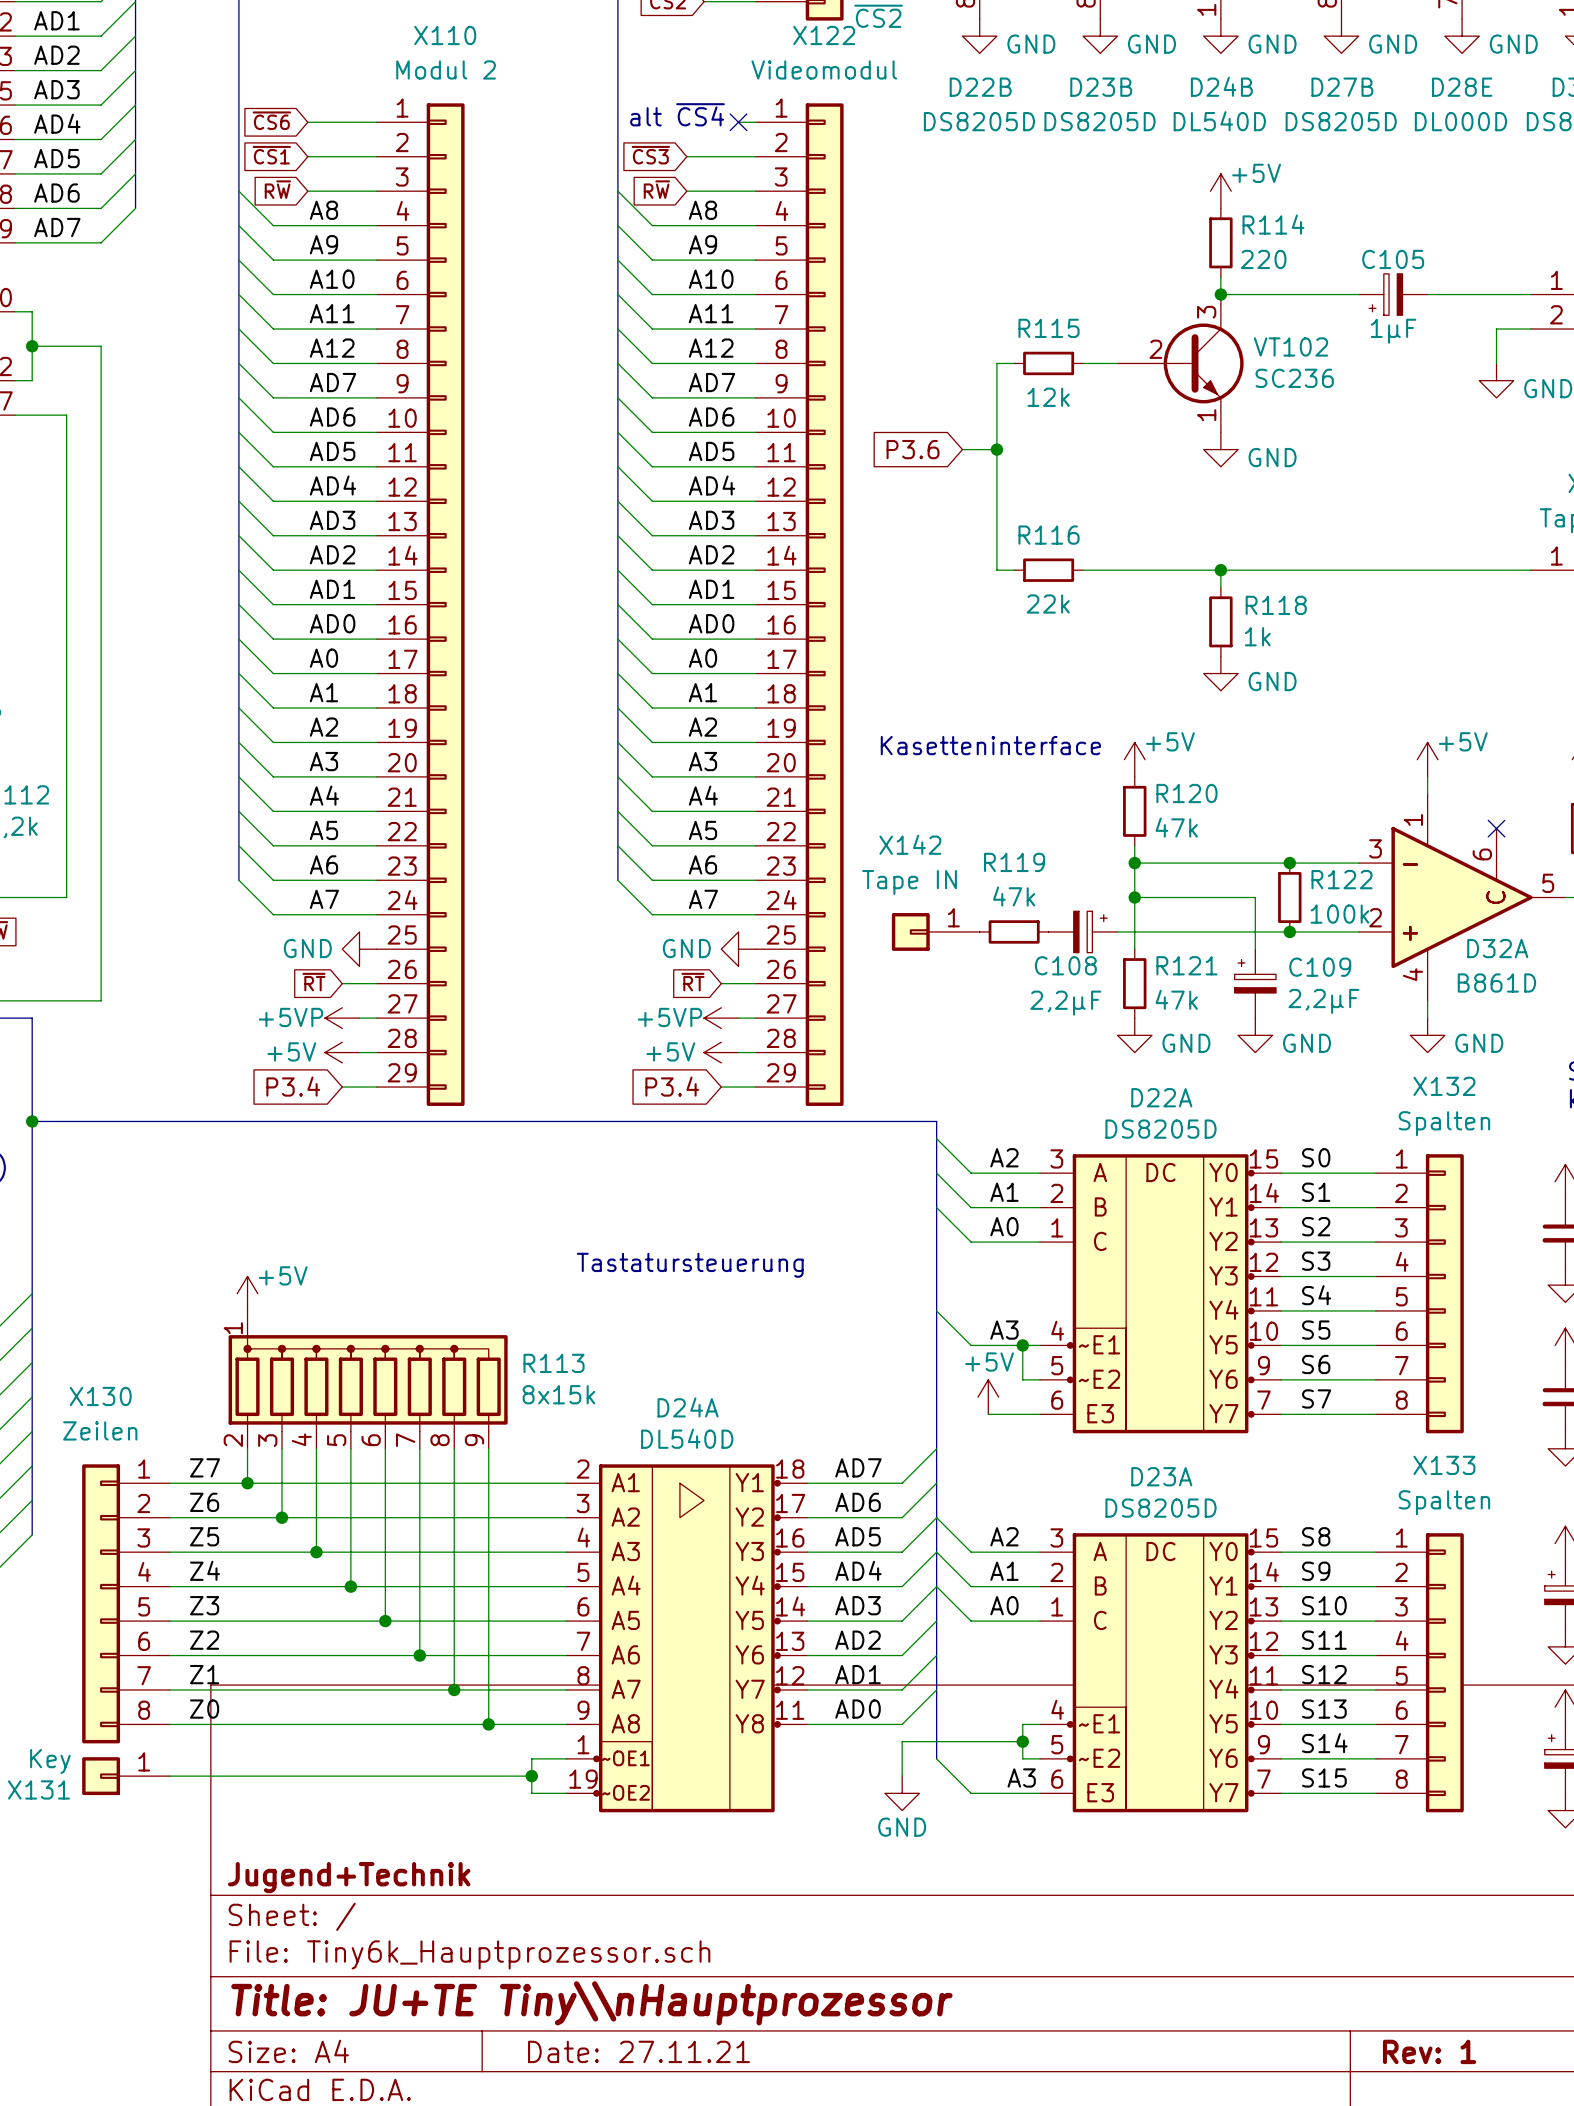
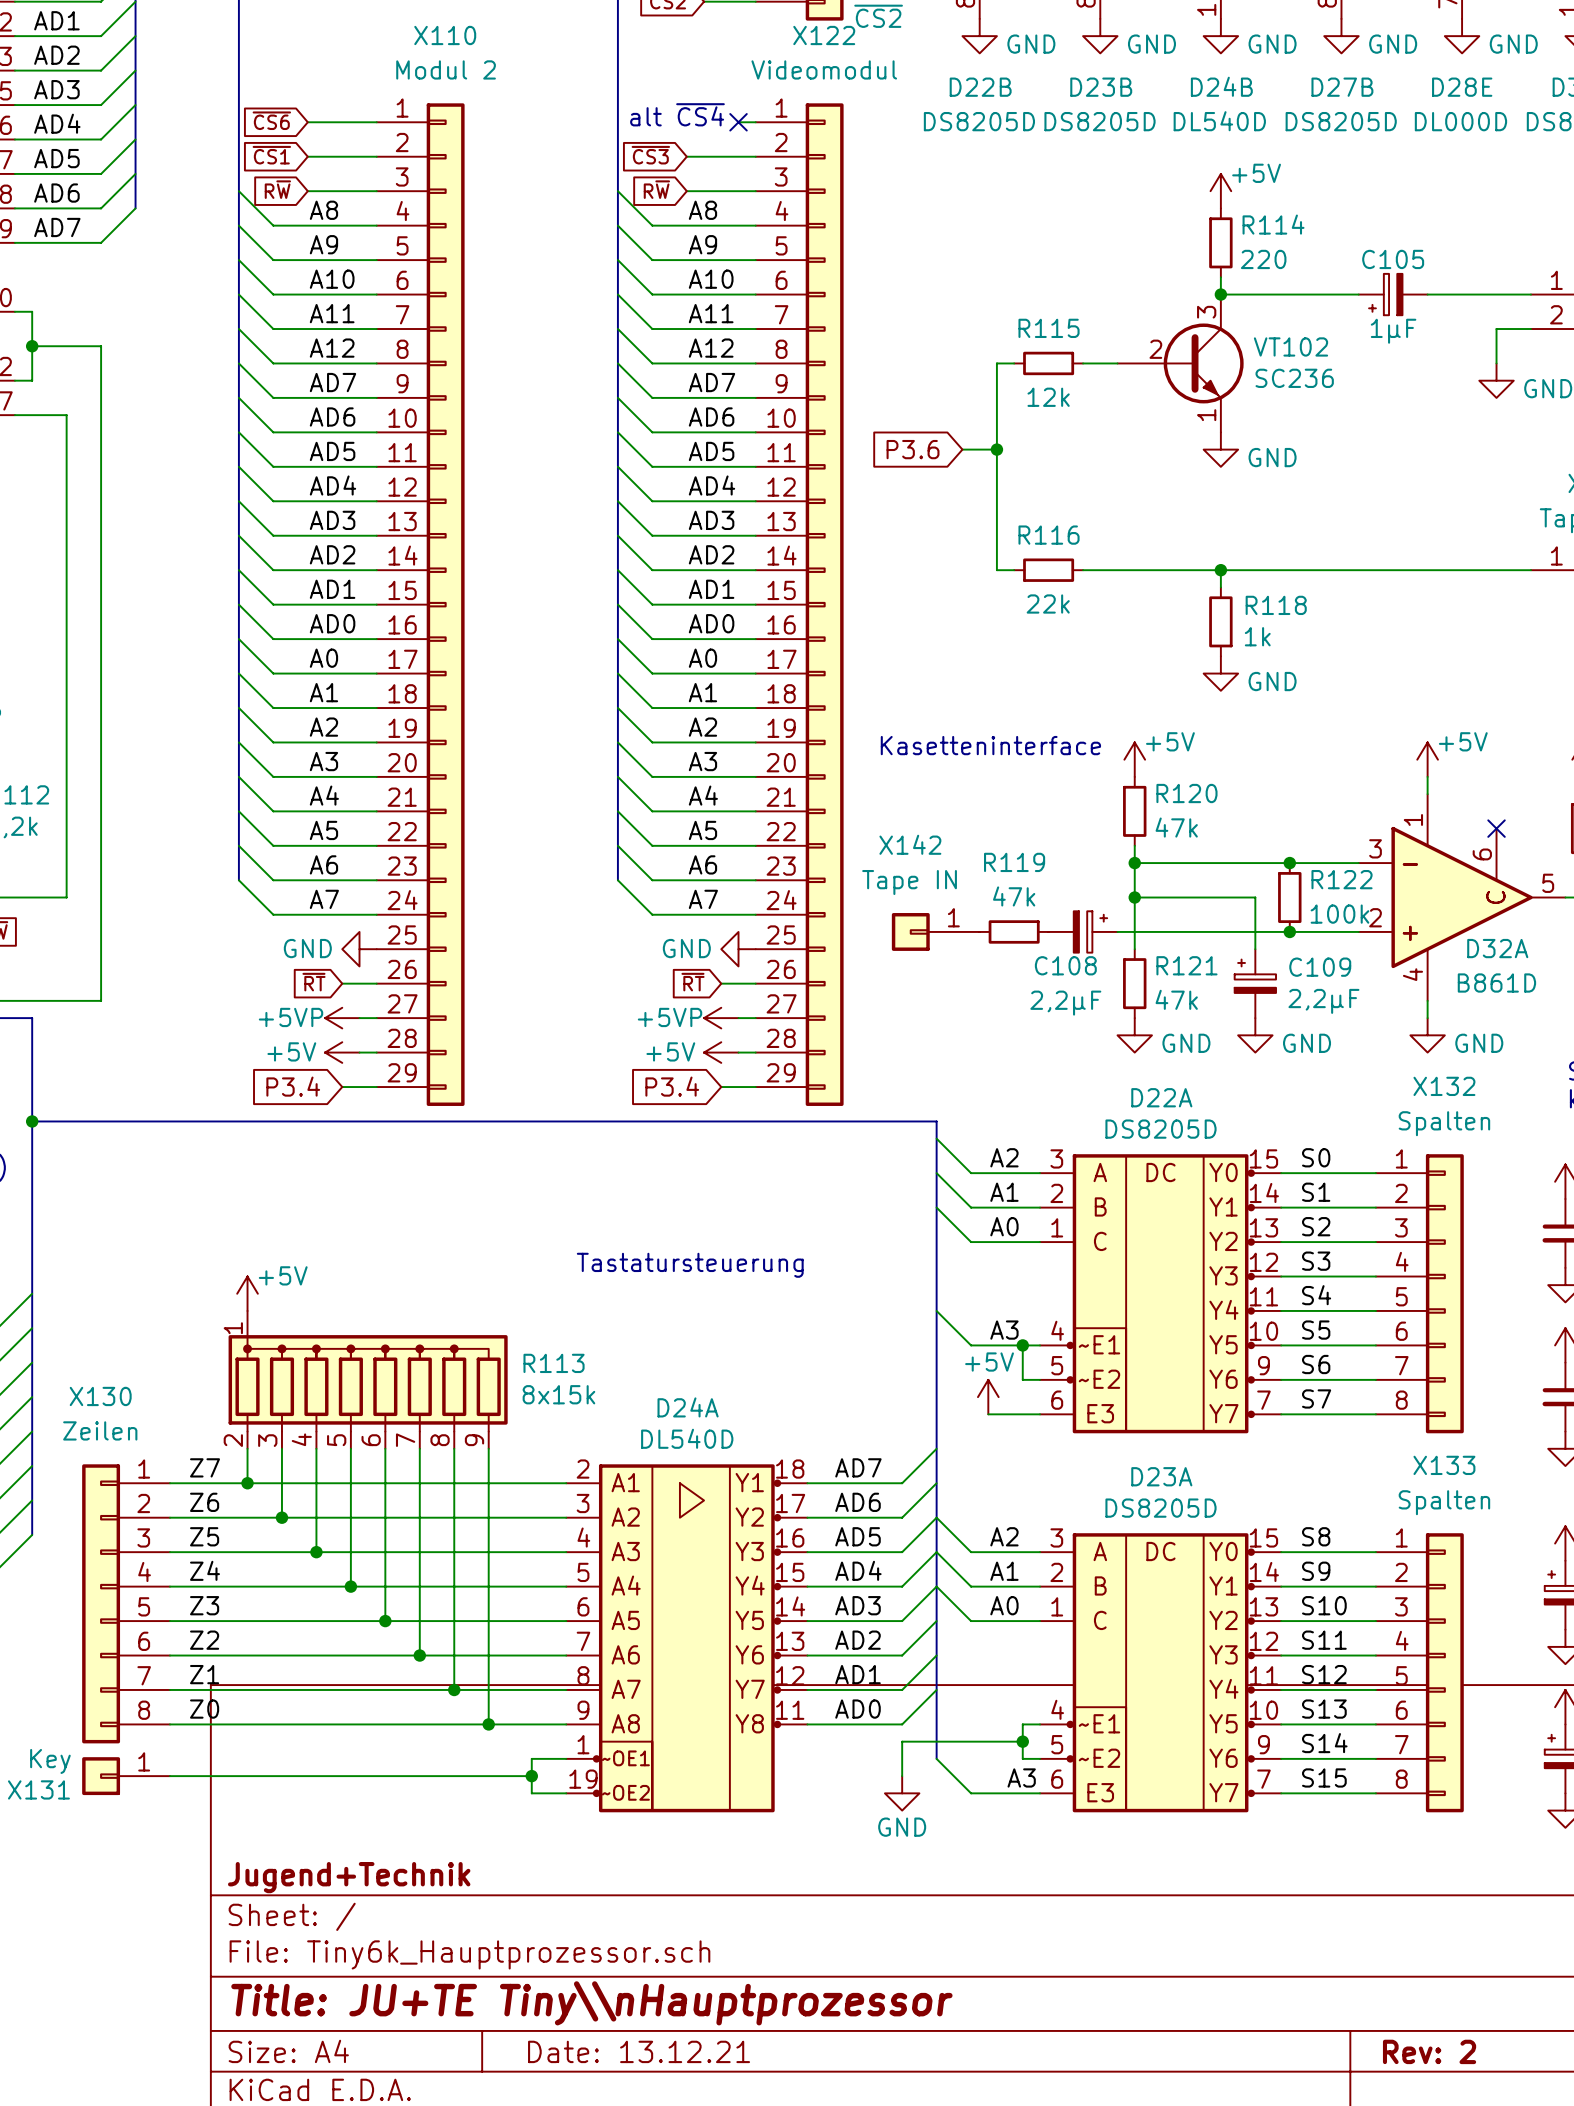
title block: Date: 27.11.21 (639, 2051) -> Date: 13.12.21 (639, 2051)
title block: Rev: 1 (1429, 2051) -> Rev: 2 (1429, 2051)

